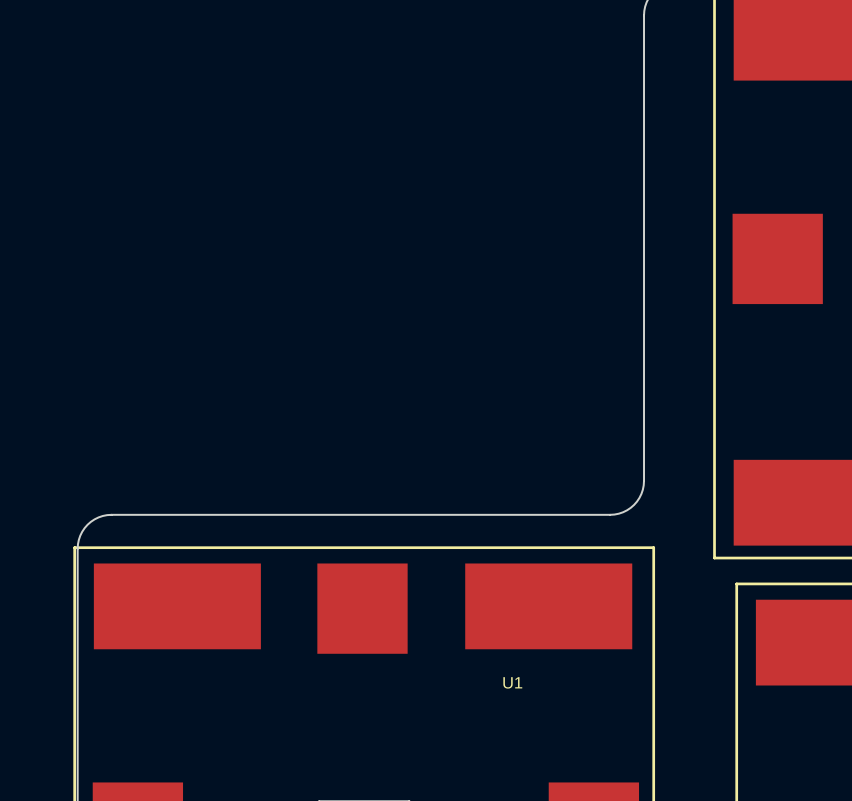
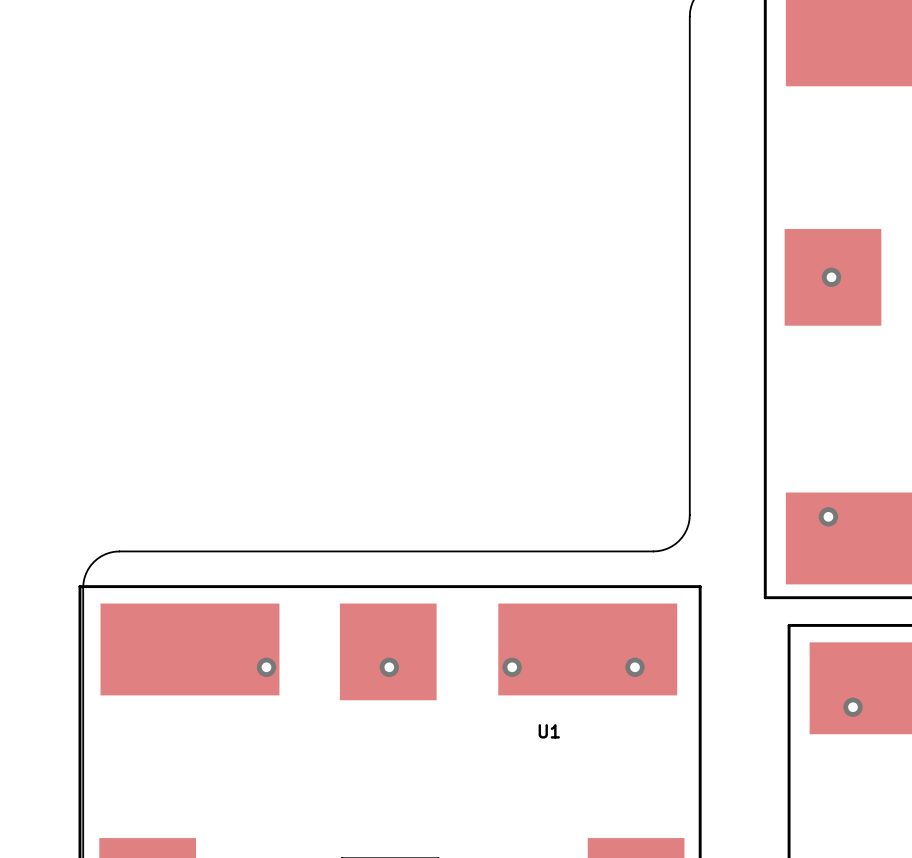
via: none -> (831, 277)
via: none -> (828, 516)
via: none -> (266, 667)
via: none -> (389, 667)
via: none -> (512, 667)
via: none -> (634, 667)
via: none -> (853, 707)

